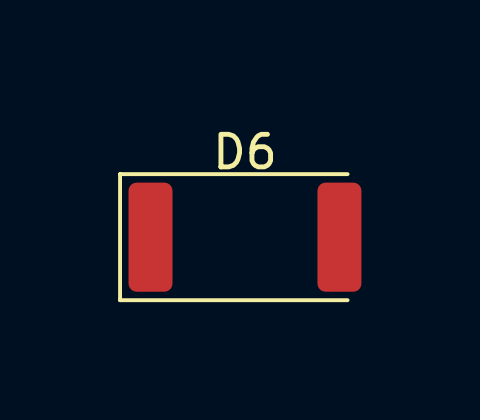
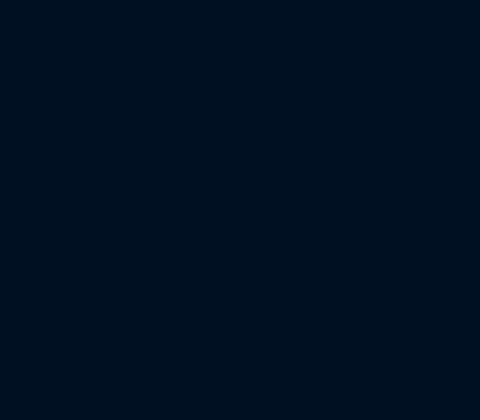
D6: (239, 237) -> none

